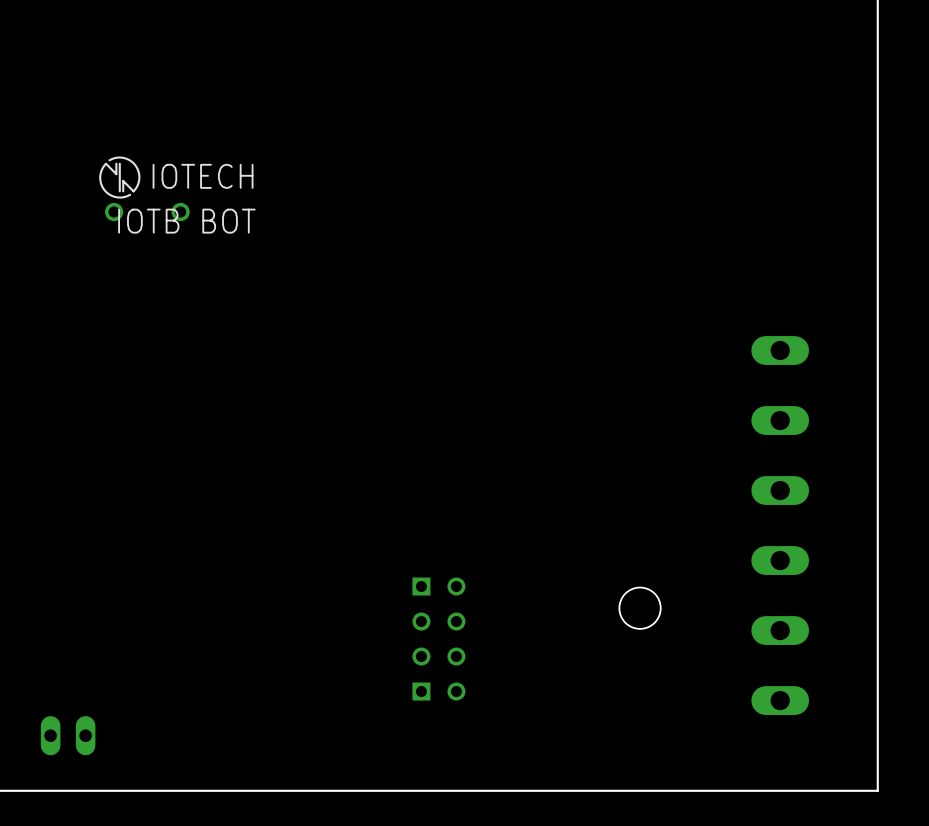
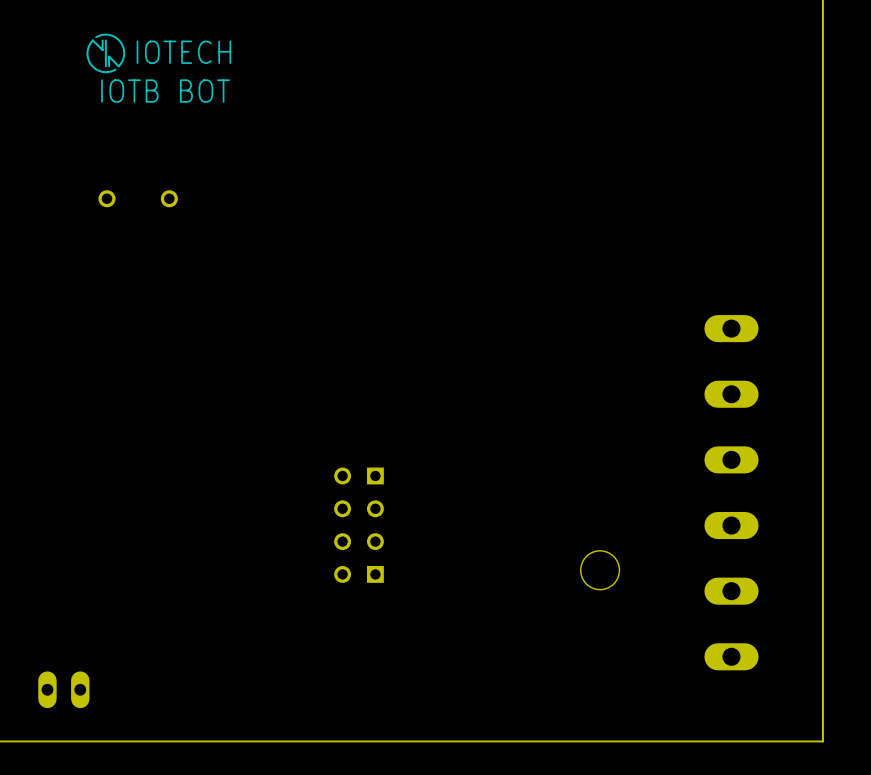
line: (109, 160) (116, 157) (125, 158) (131, 161) (137, 169) (139, 178) (136, 187) (133, 191) (123, 180) (123, 191) -> (96, 37) (102, 34) (111, 35) (117, 38) (122, 45) (124, 54) (121, 62) (118, 66) (109, 56) (109, 66)
line: (116, 163) (116, 174) (106, 163) (103, 167) (100, 176) (101, 185) (107, 193) (114, 196) (123, 197) (130, 194) -> (102, 40) (102, 50) (92, 40) (90, 43) (87, 52) (89, 61) (94, 68) (100, 71) (109, 71) (115, 69)
line: (119, 163) (119, 191) -> (105, 40) (105, 66)
text position: IOTECH (203, 176) -> IOTECH (183, 52)
text position: IOTB BOT (186, 221) -> IOTB BOT (165, 91)
part rotation: 0° (438, 639) -> 180° (359, 525)
part position: (438, 639) -> (359, 525)

